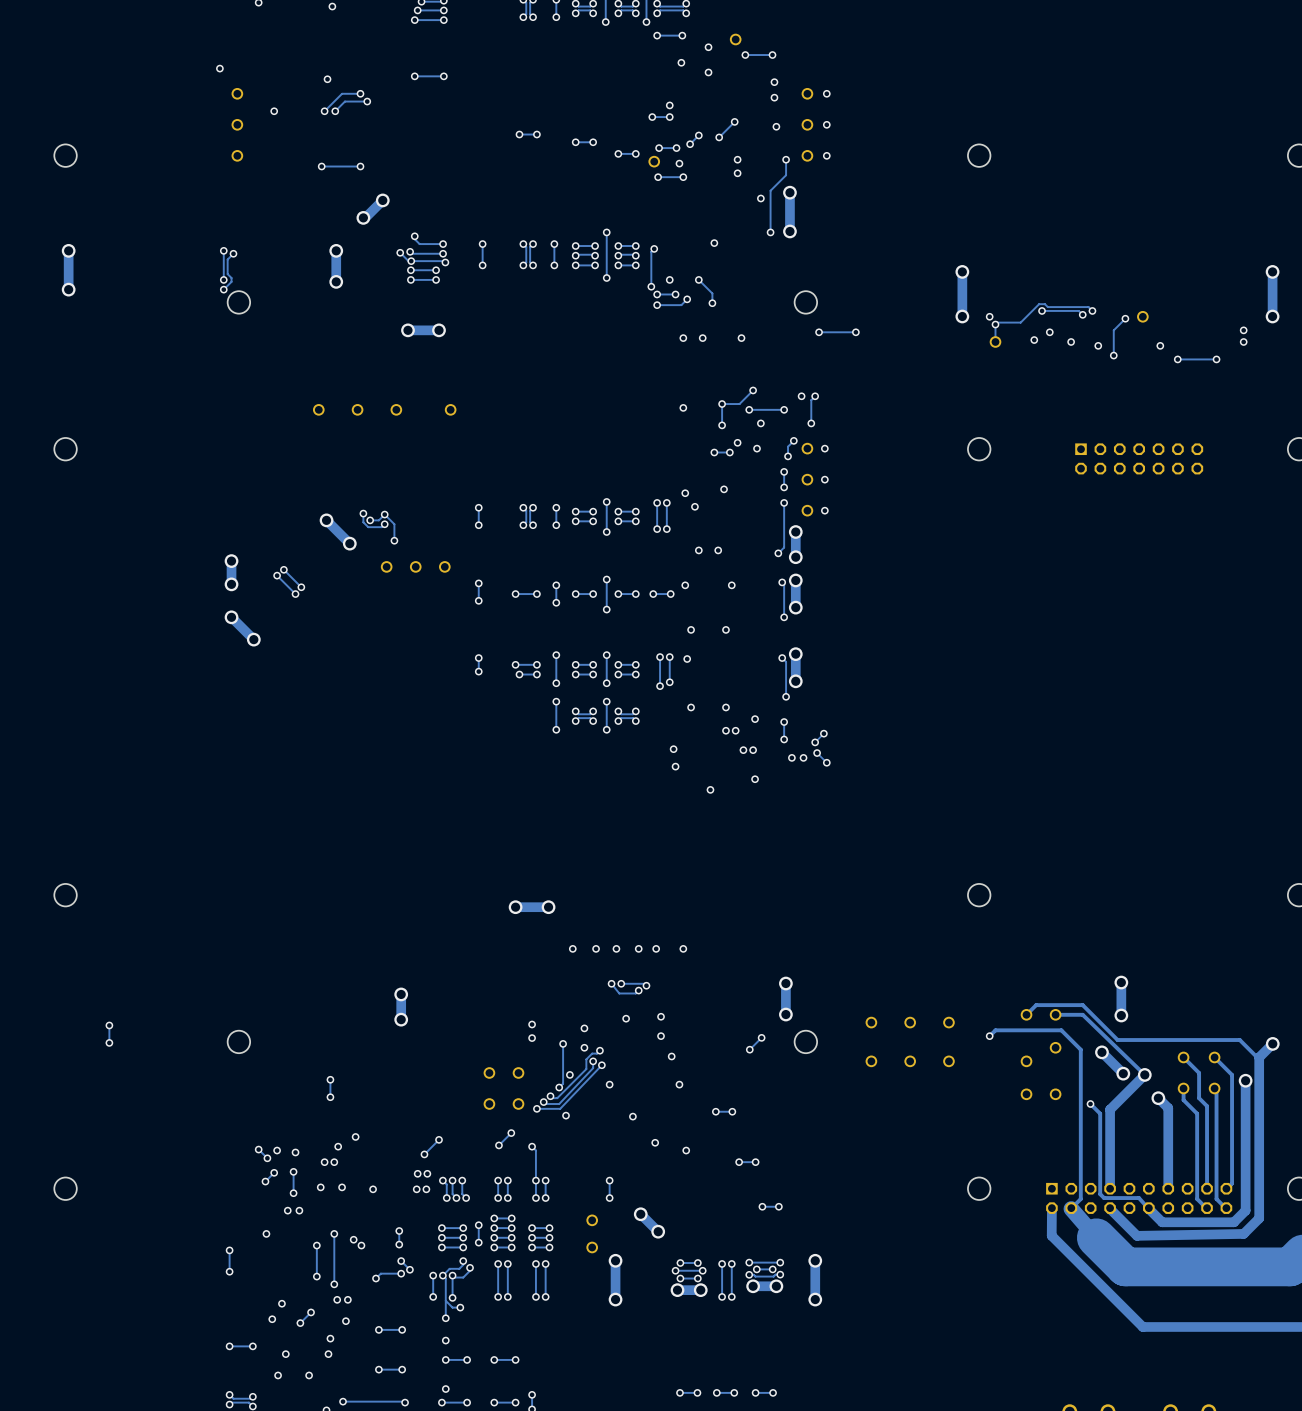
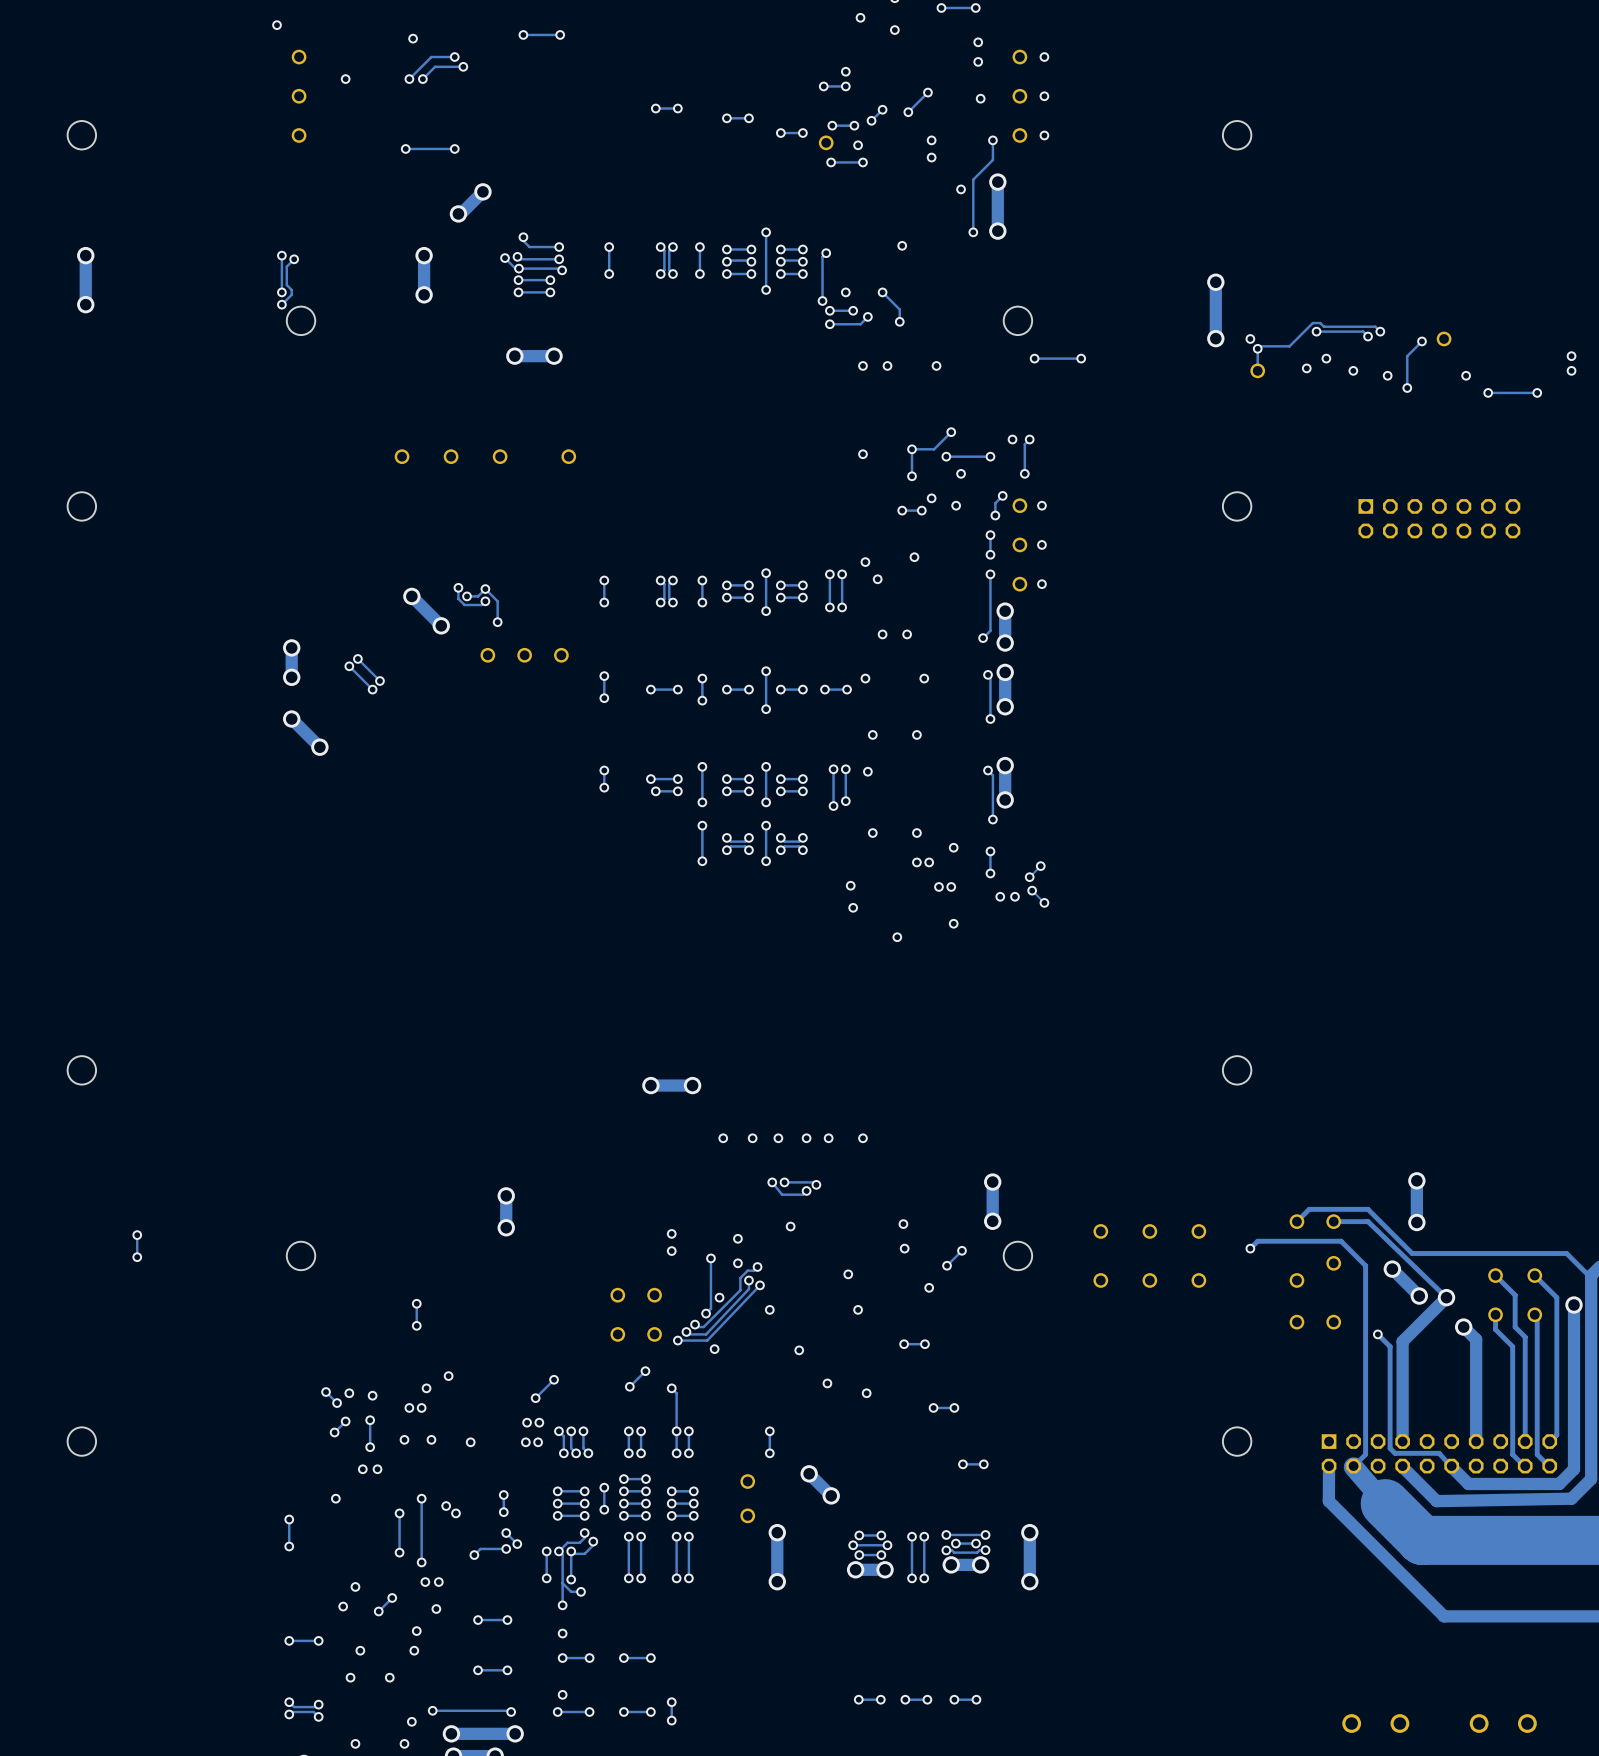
via: (661, 1016) -> none
via: none -> (903, 1224)
via: (661, 1036) -> none
via: none -> (904, 1248)
via: none -> (929, 1287)

